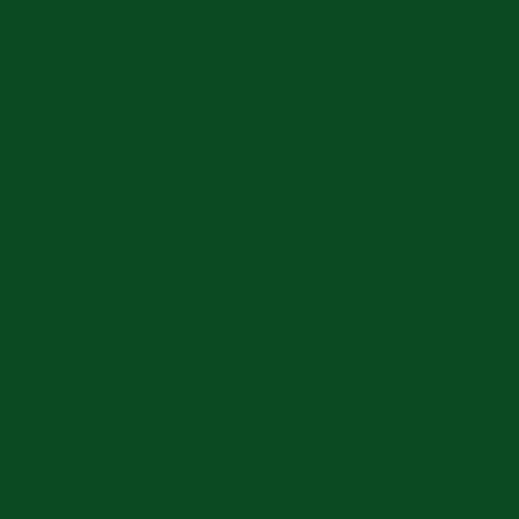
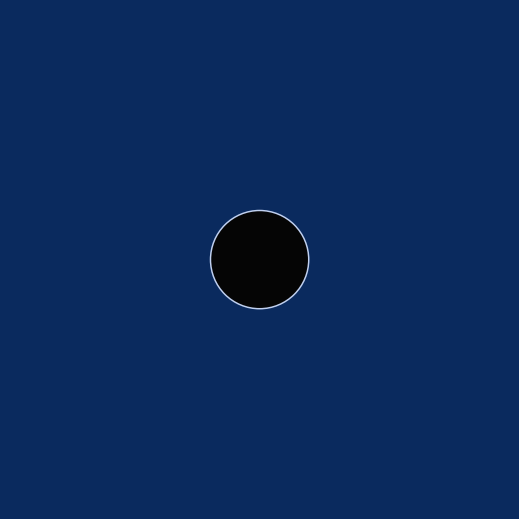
part: none -> (259, 259)

